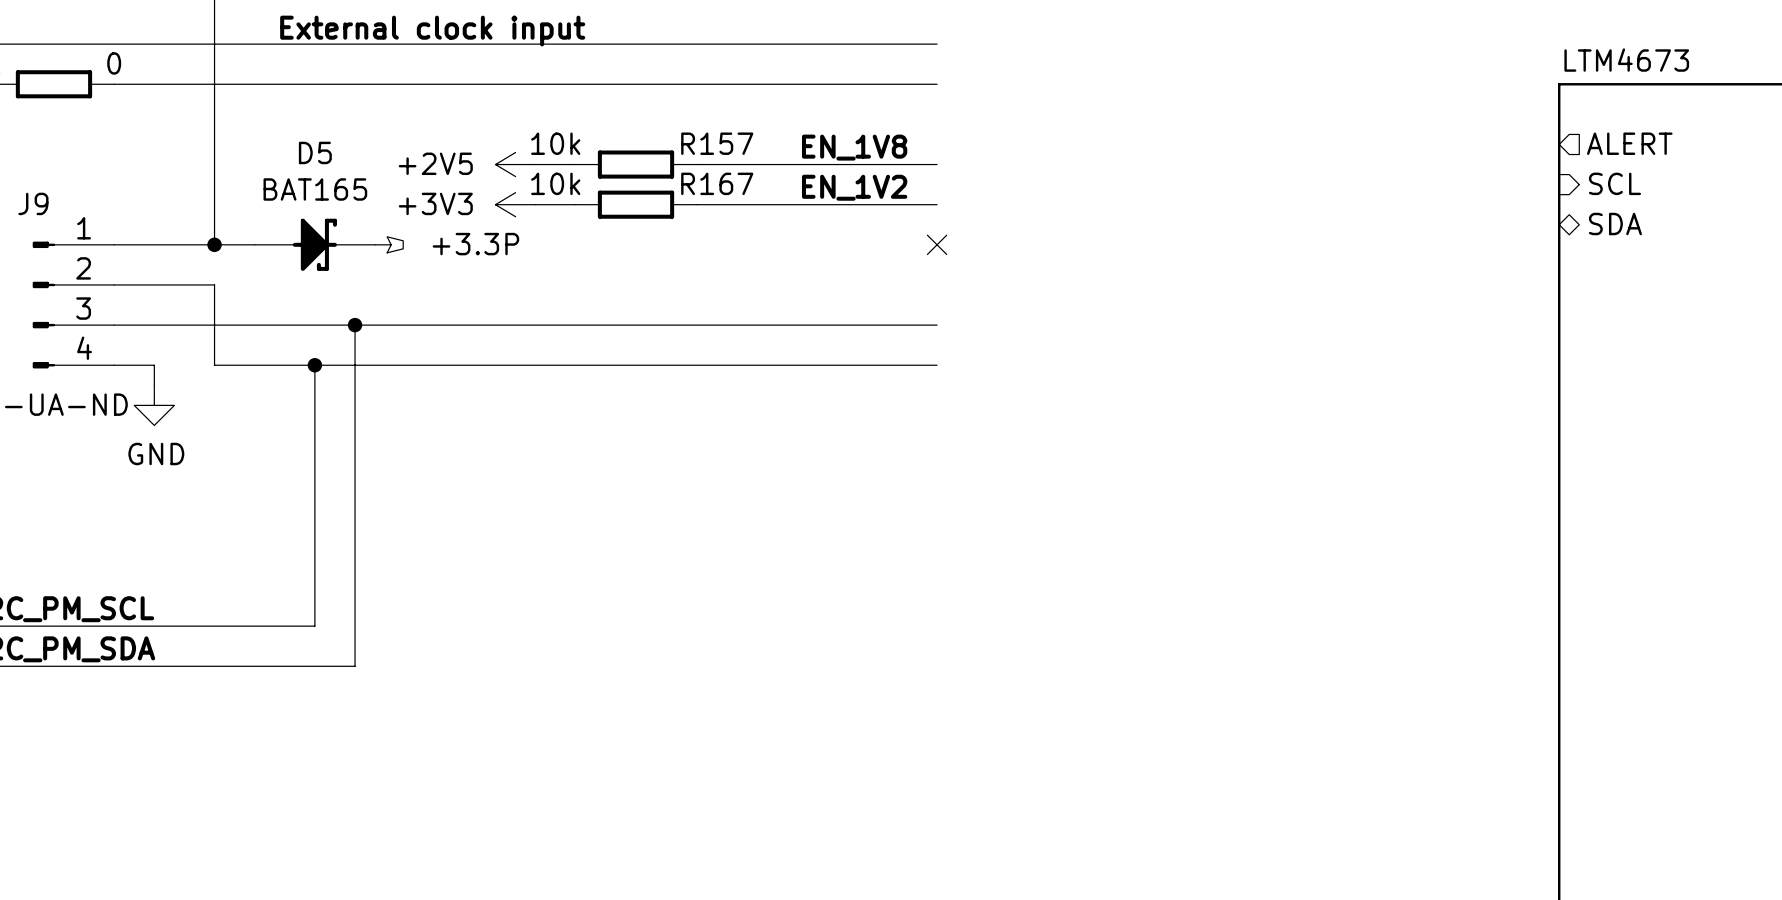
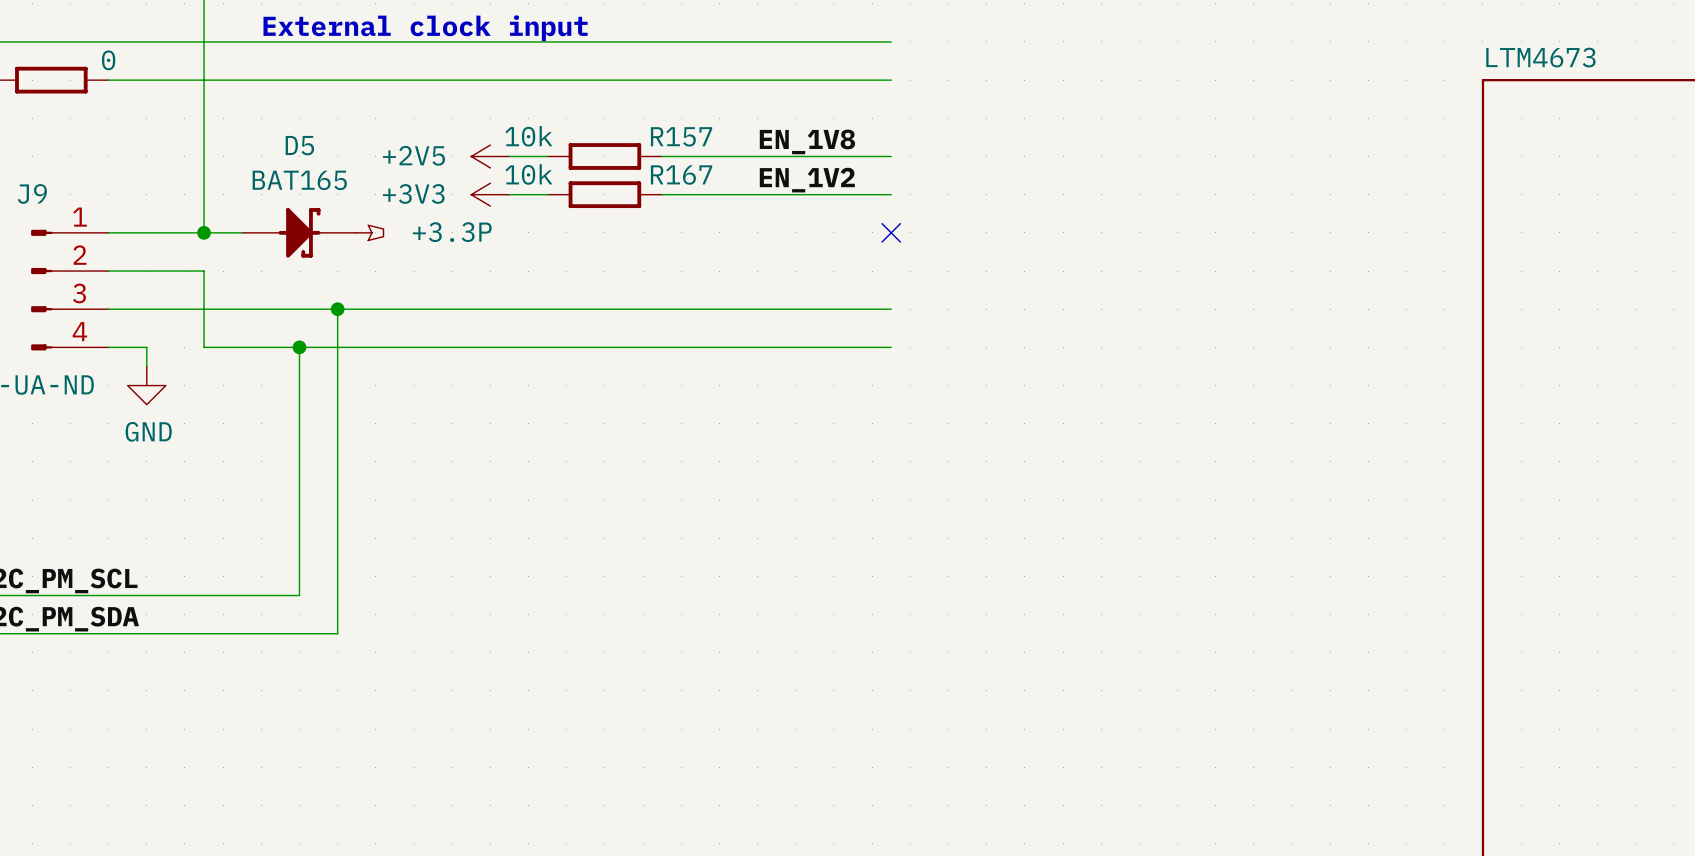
sheet pin: ALERT (1629, 143) -> none
sheet pin: SCL (1614, 183) -> none
sheet pin: SDA (1615, 224) -> none

